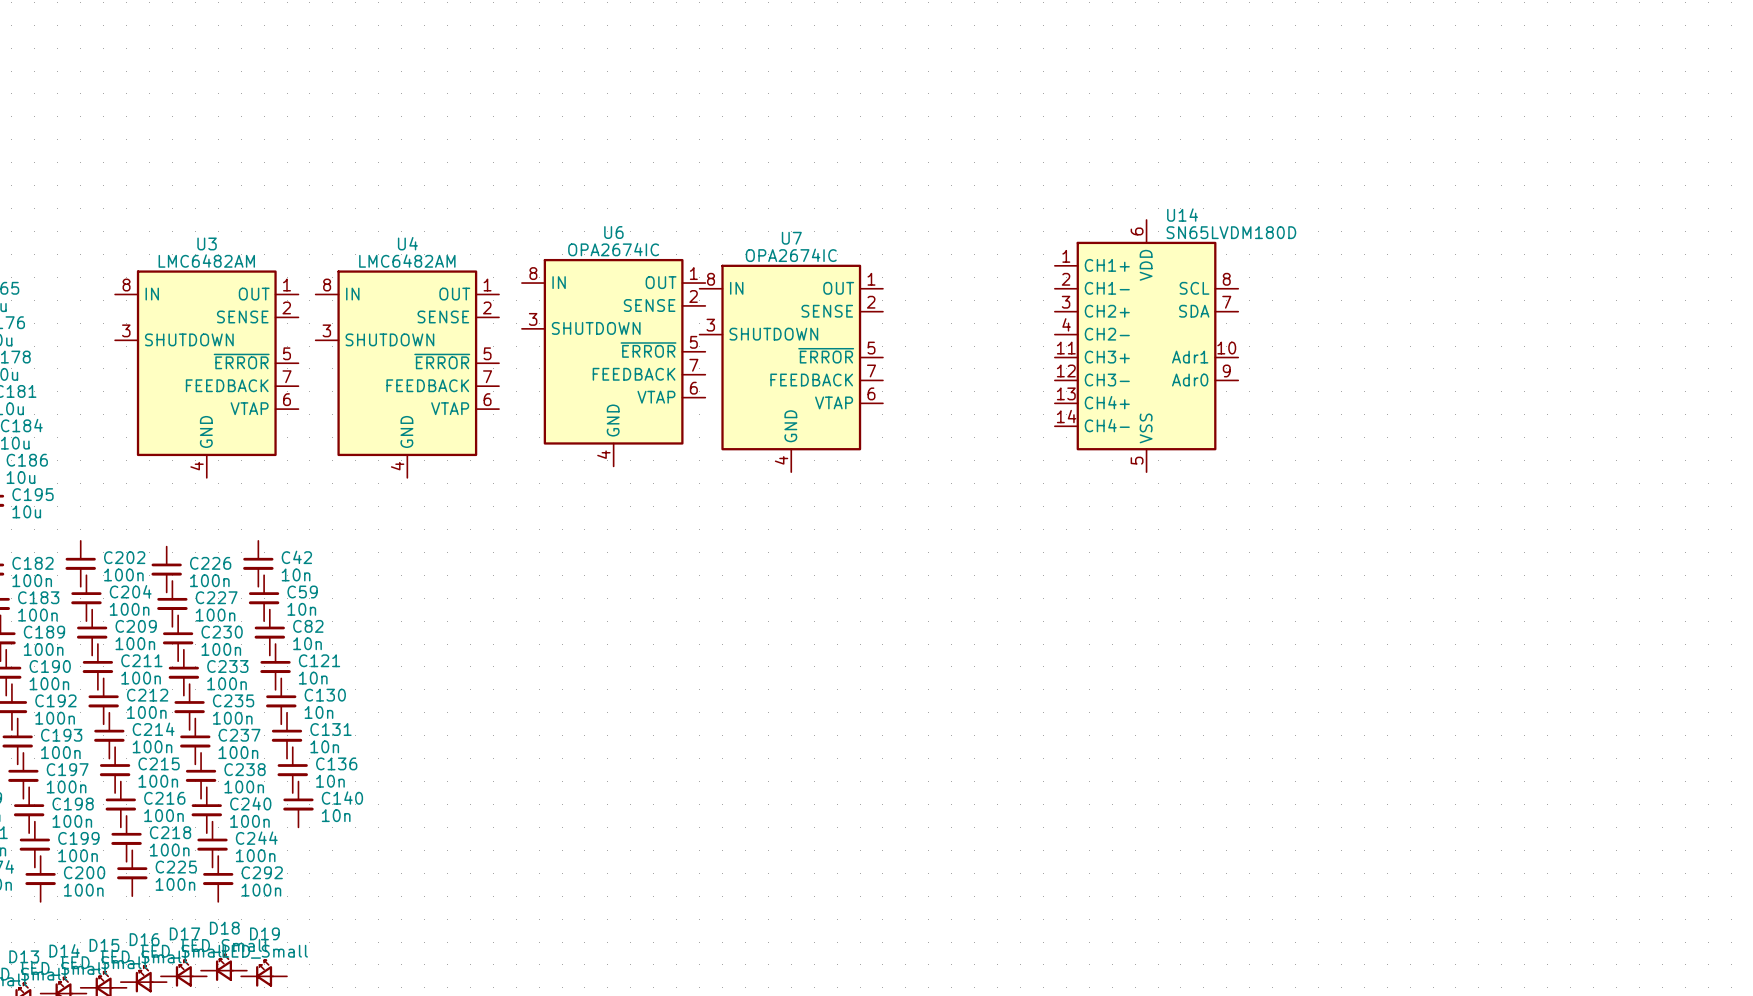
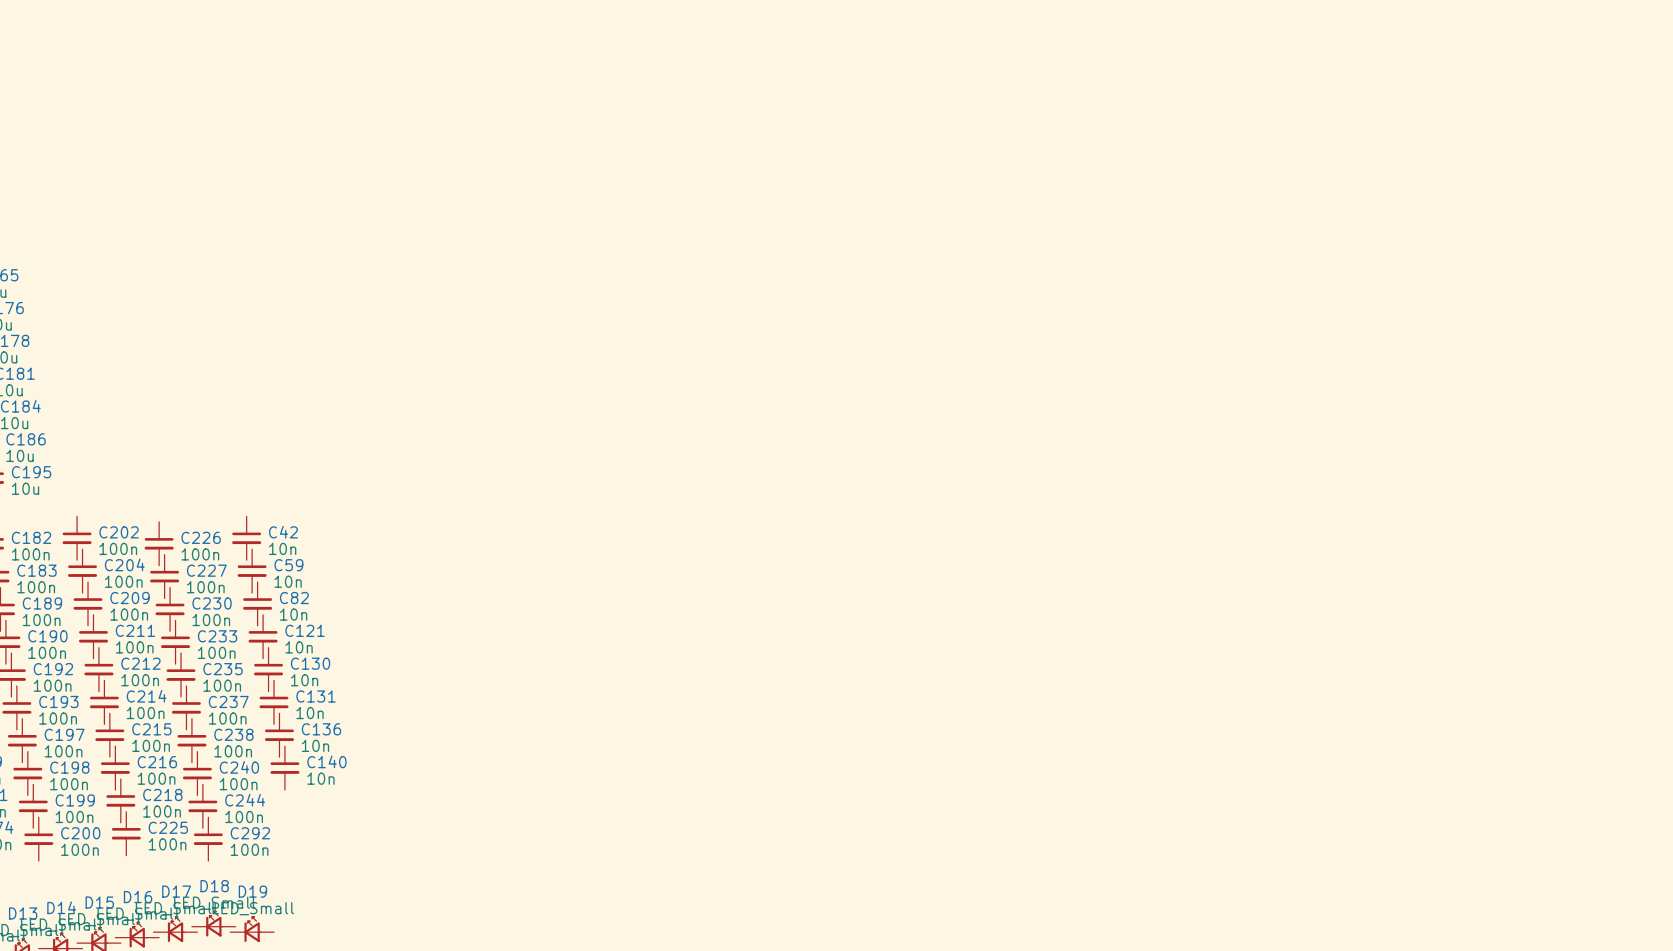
U14: SN65LVDM180D (1146, 346) -> none
U6: OPA2674IC (613, 362) -> none
U7: OPA2674IC (791, 368) -> none
U3: LMC6482AM (206, 374) -> none
U4: LMC6482AM (407, 374) -> none

